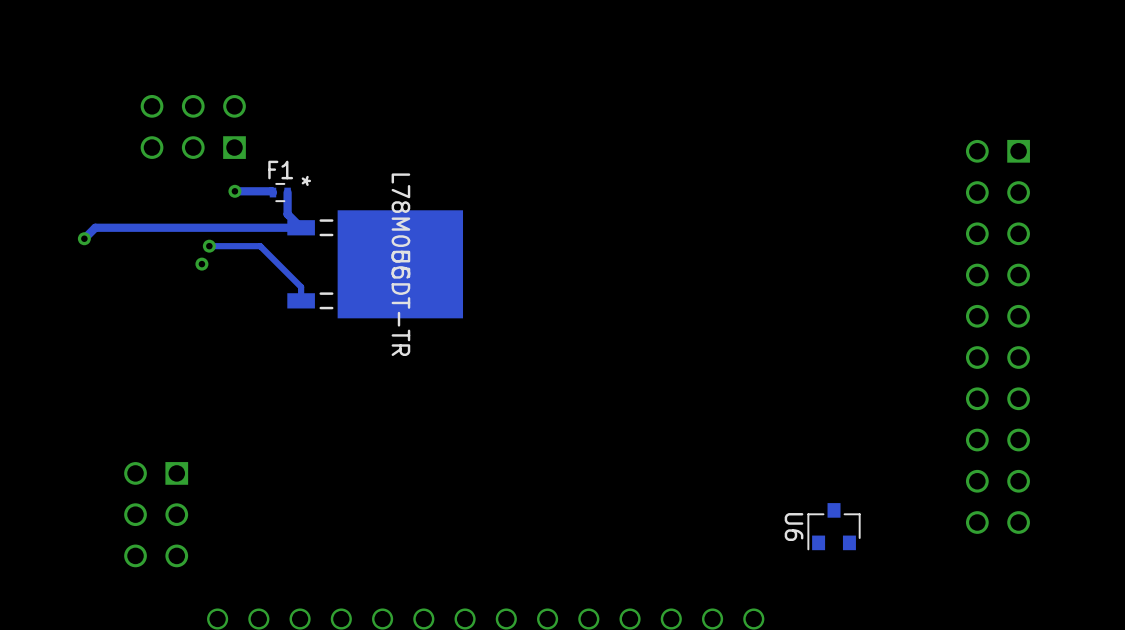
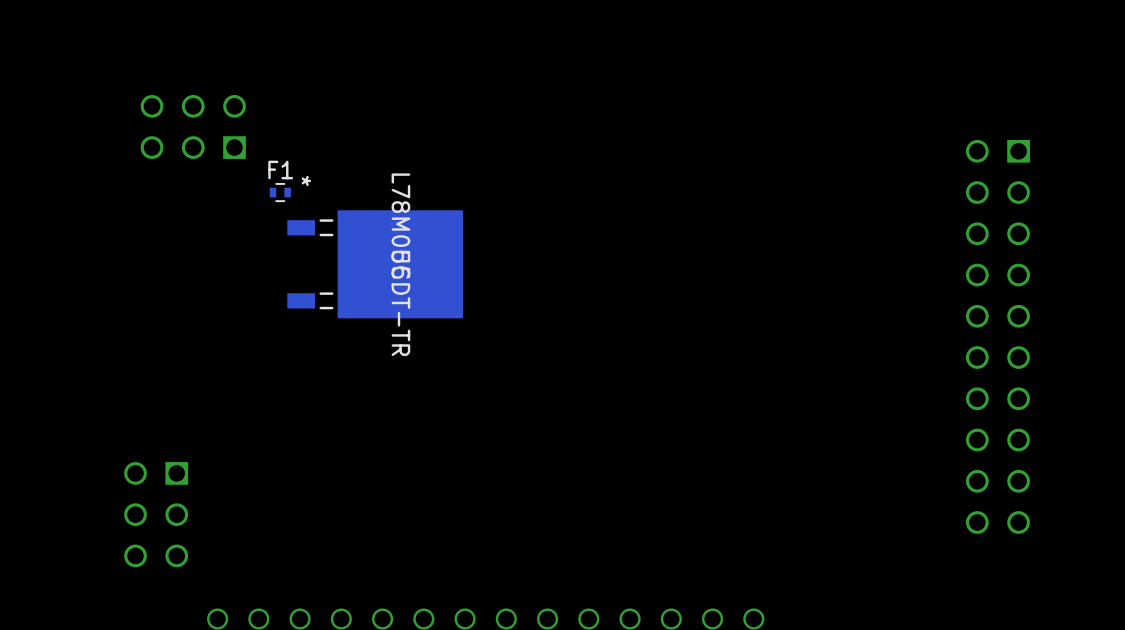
track: (234, 191) (272, 192) -> none
via: (234, 191) -> none
track: (287, 192) (287, 214) (301, 227) (95, 227) (84, 238) -> none
via: (84, 238) -> none
track: (209, 246) (260, 246) (301, 287) (301, 300) -> none
via: (209, 246) -> none
via: (201, 264) -> none
U6: (834, 526) -> none

